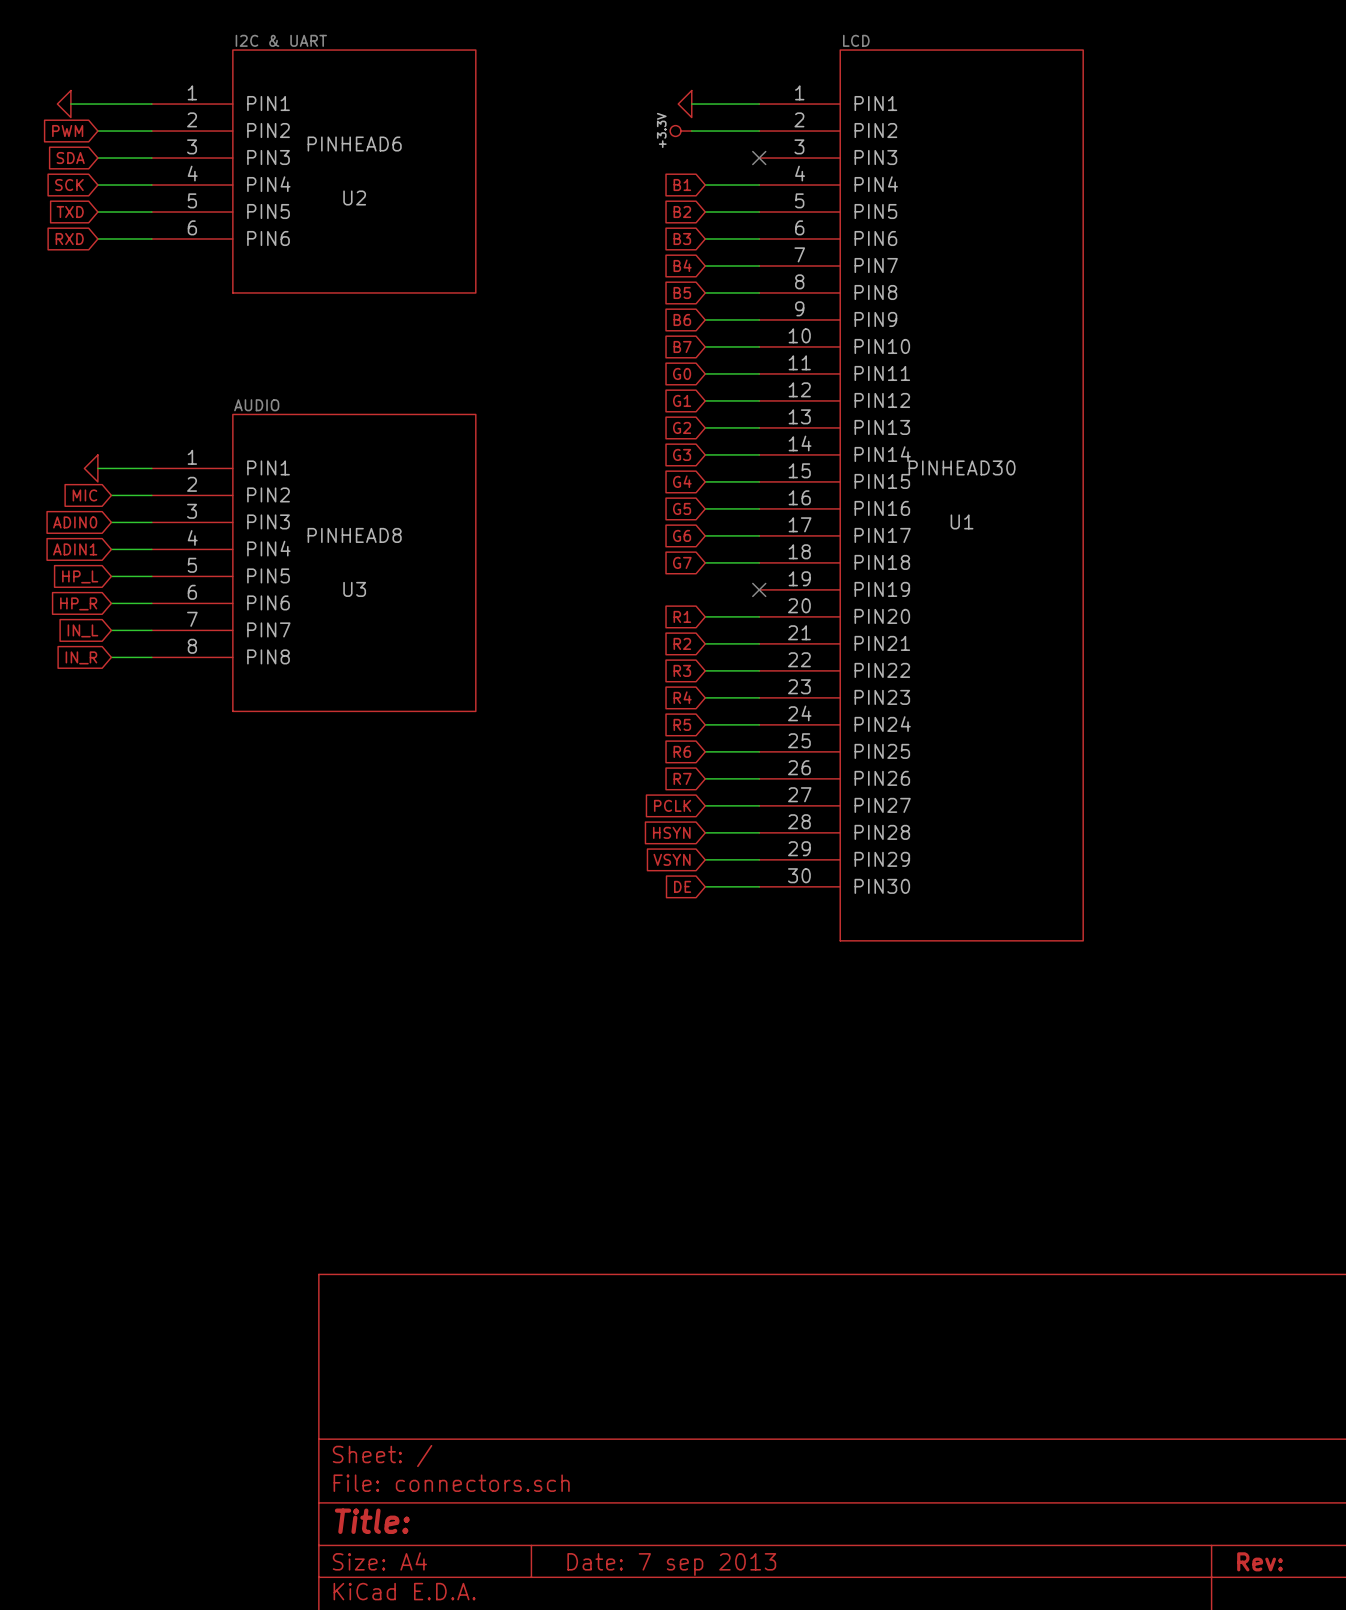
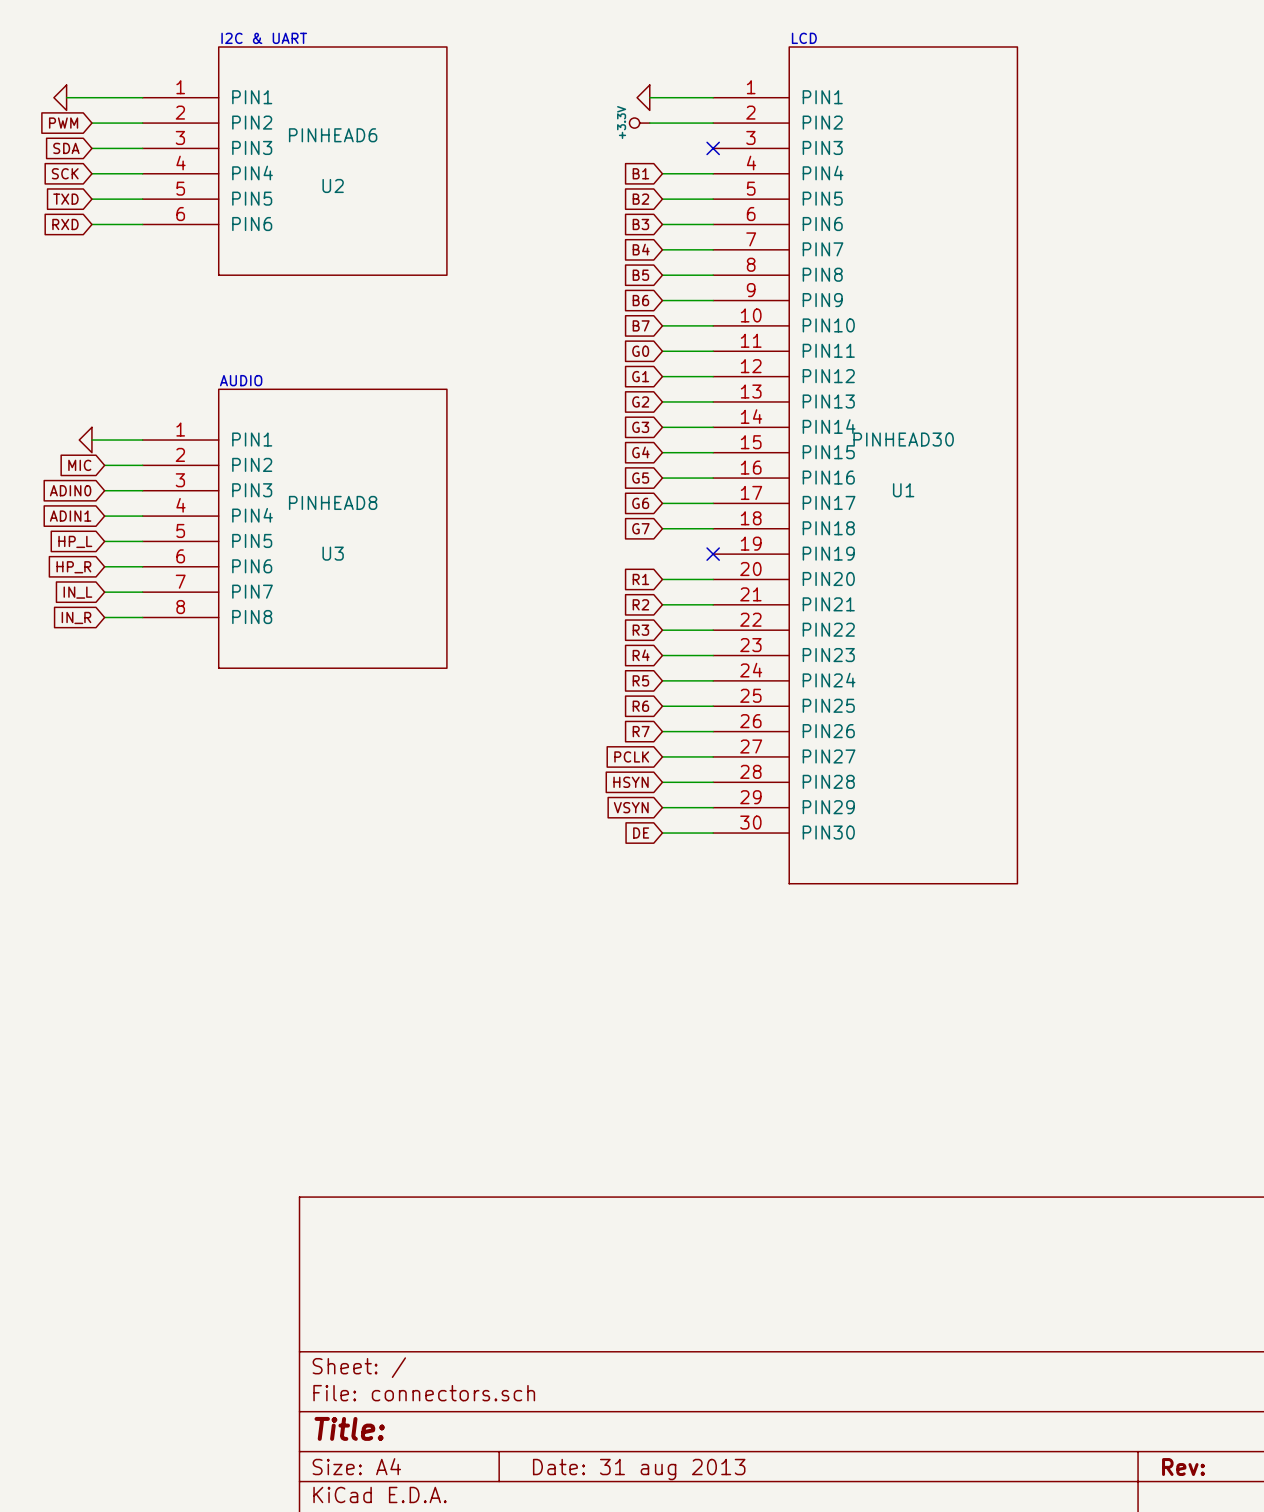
title block: Date: 7 sep 2013 (671, 1564) -> Date: 31 aug 2013 (639, 1469)

